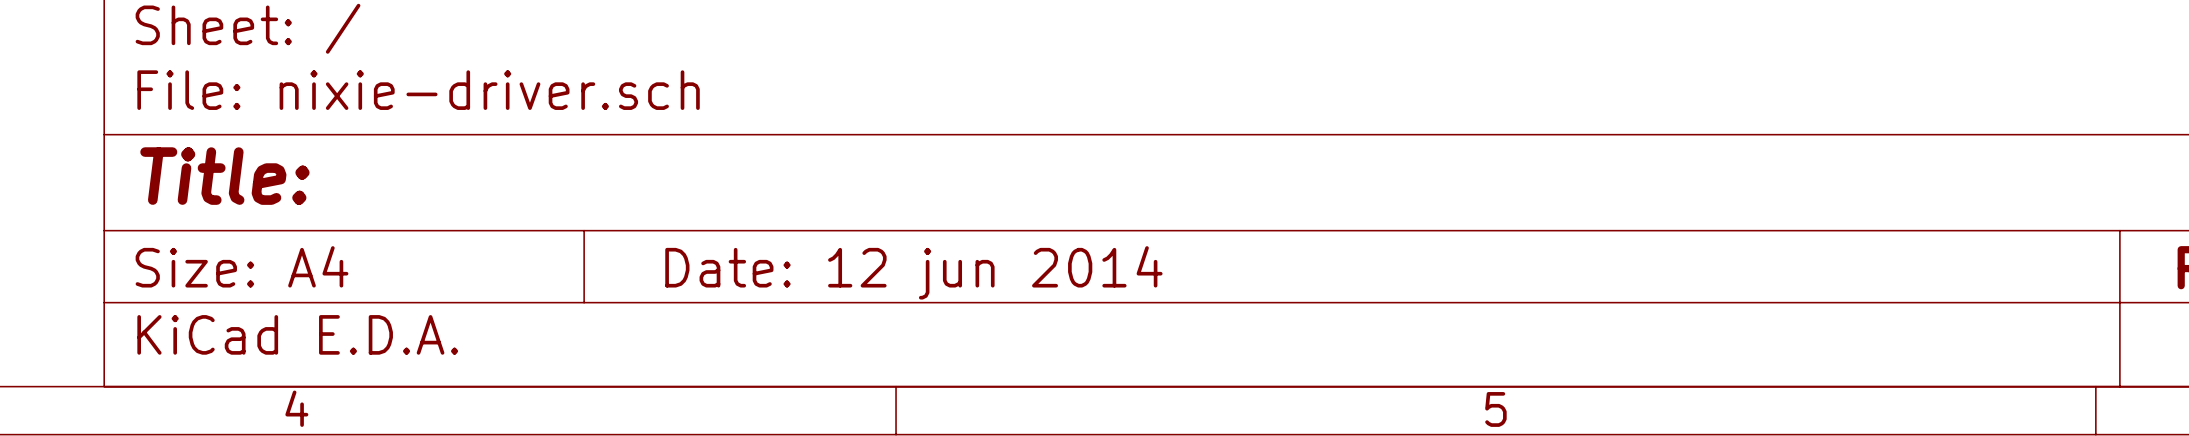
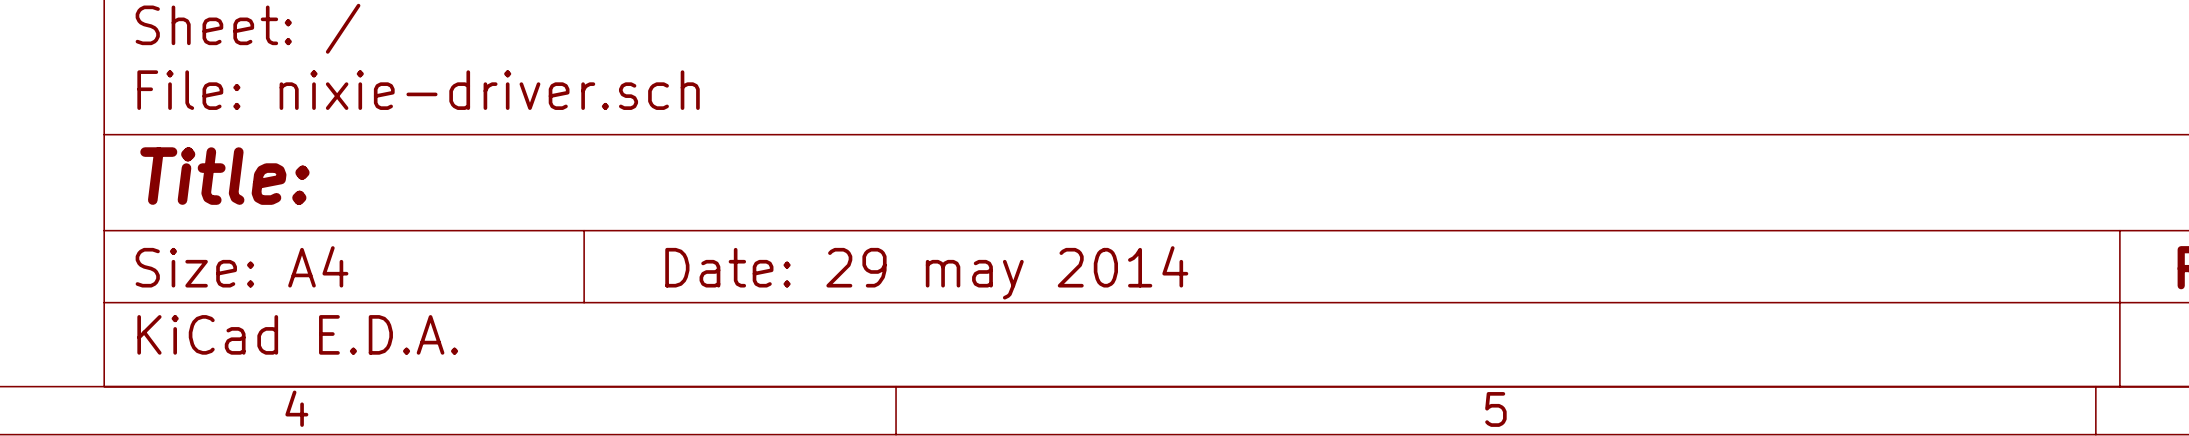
title block: Date: 12 jun 2014 (913, 272) -> Date: 29 may 2014 (926, 272)

